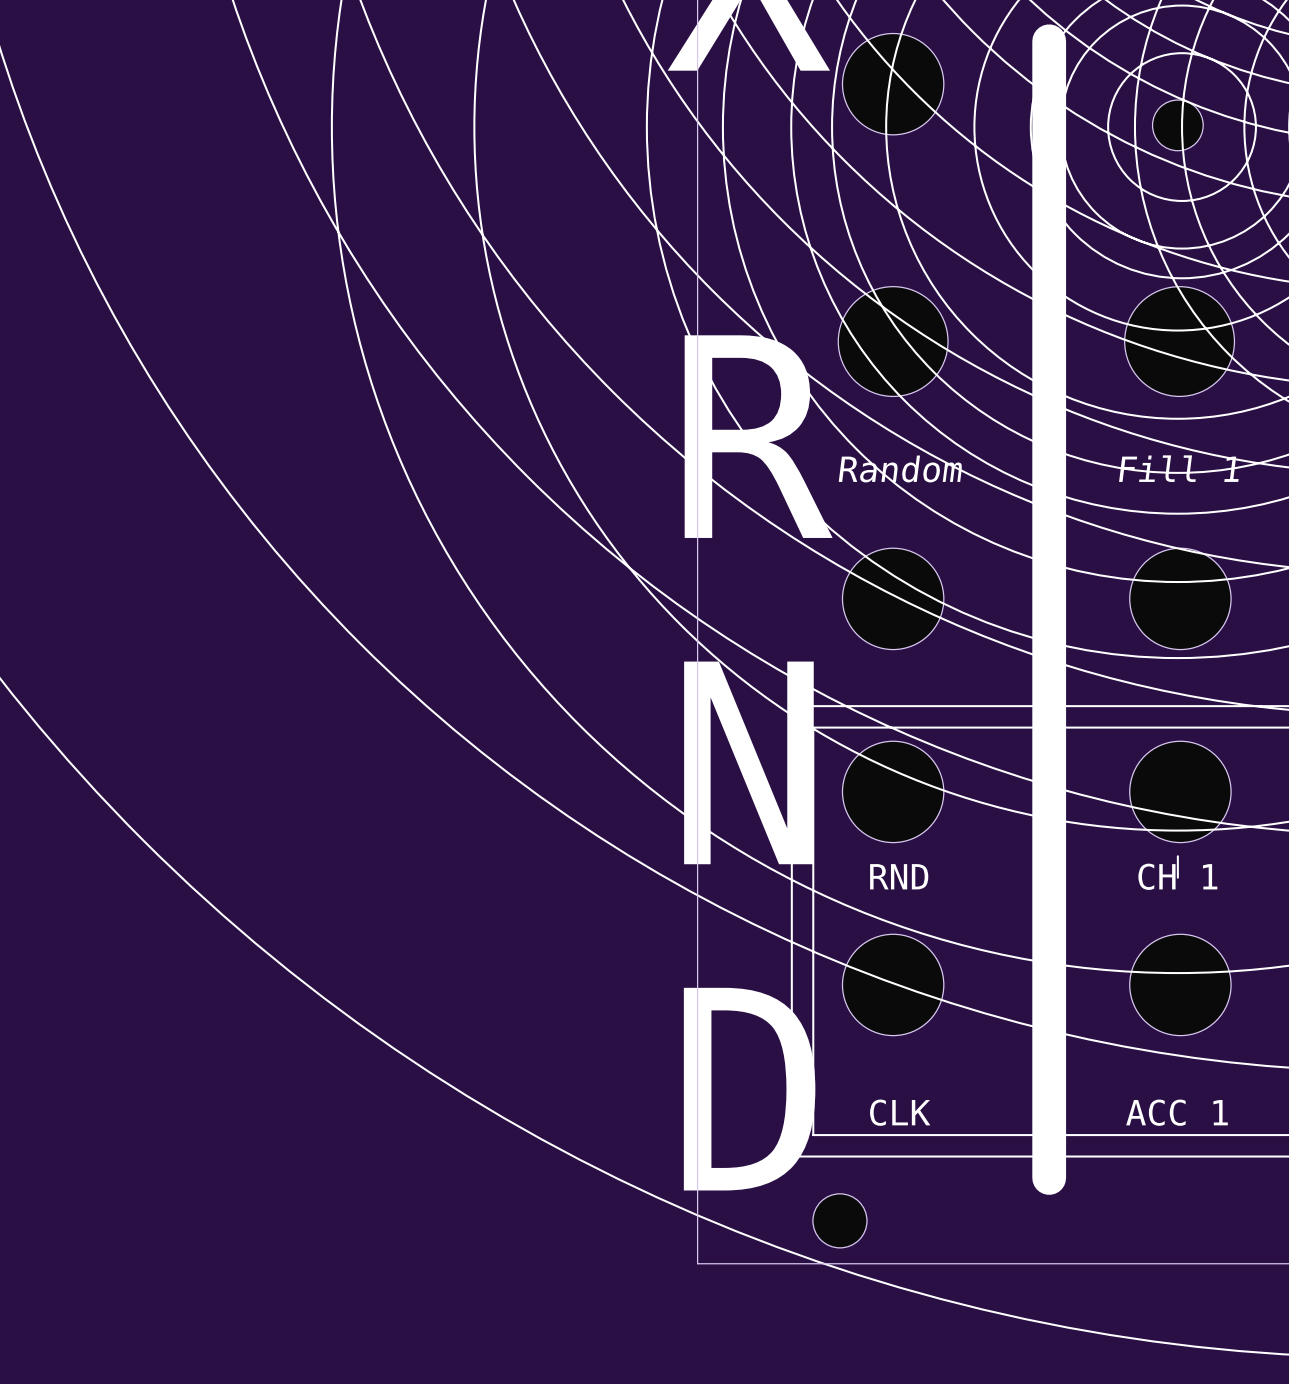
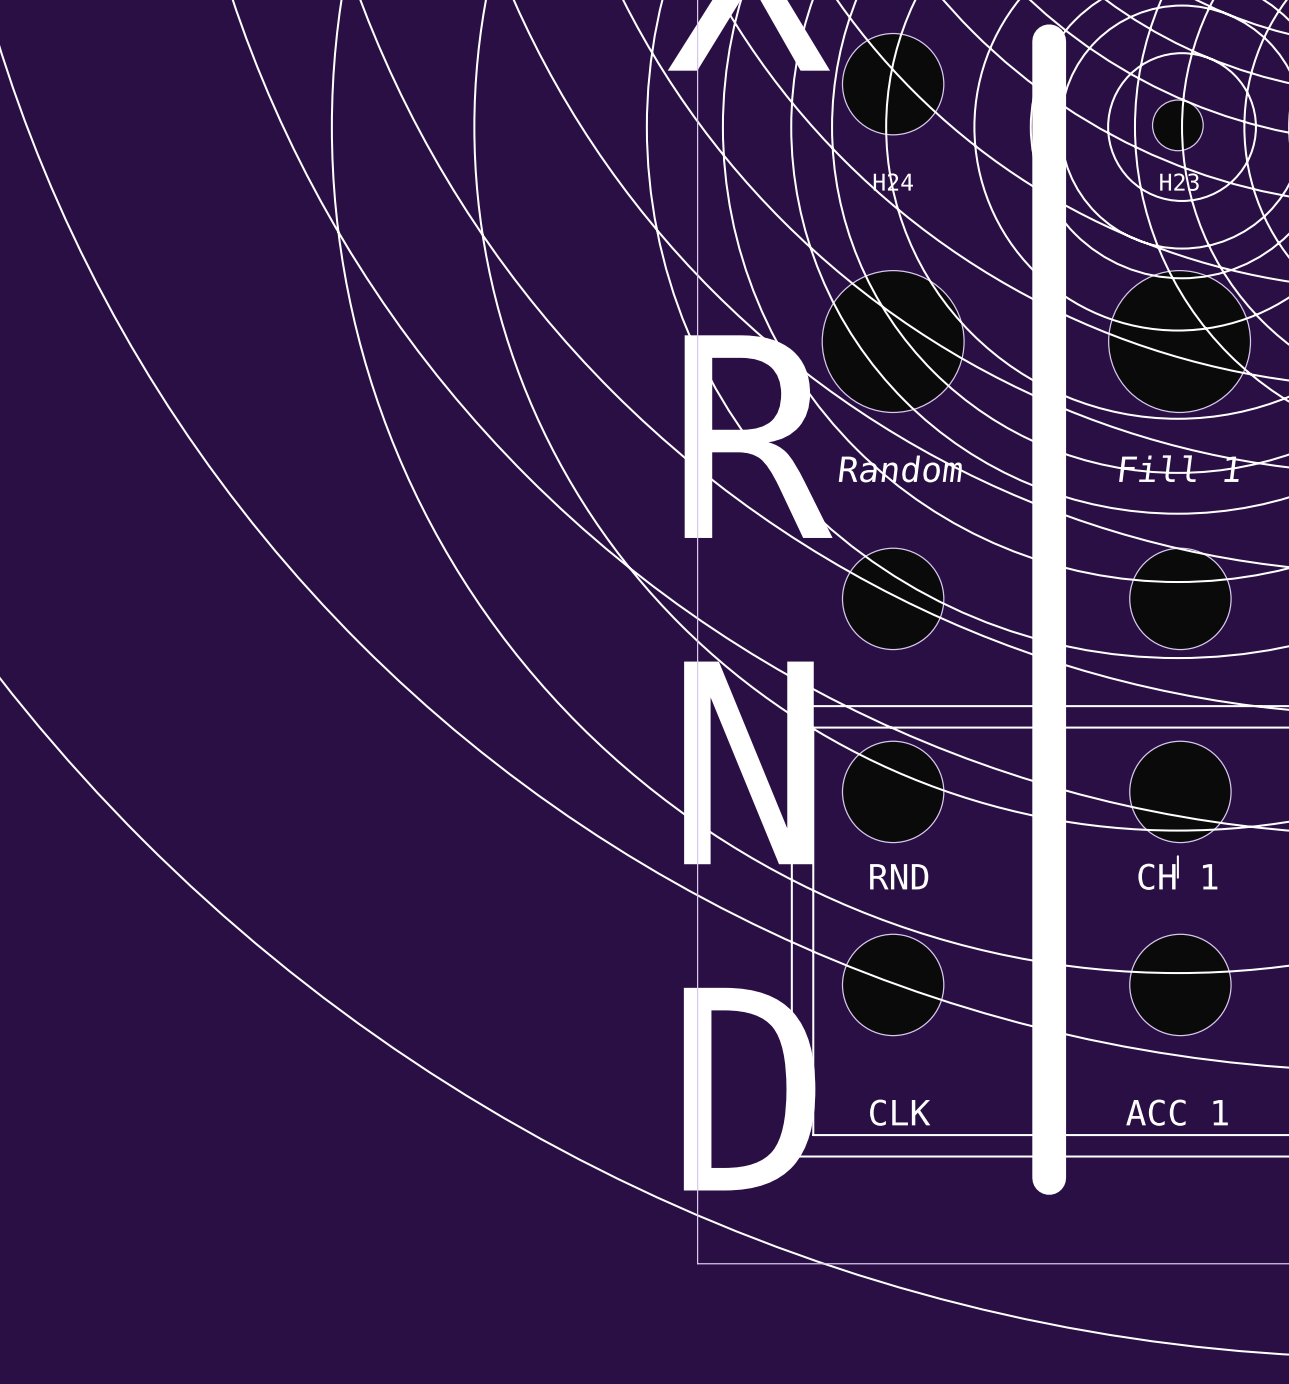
part: (893, 341) -> none
H24: none -> (893, 341)
part: (1179, 341) -> none
H23: none -> (1179, 341)
part: (839, 1220) -> none

